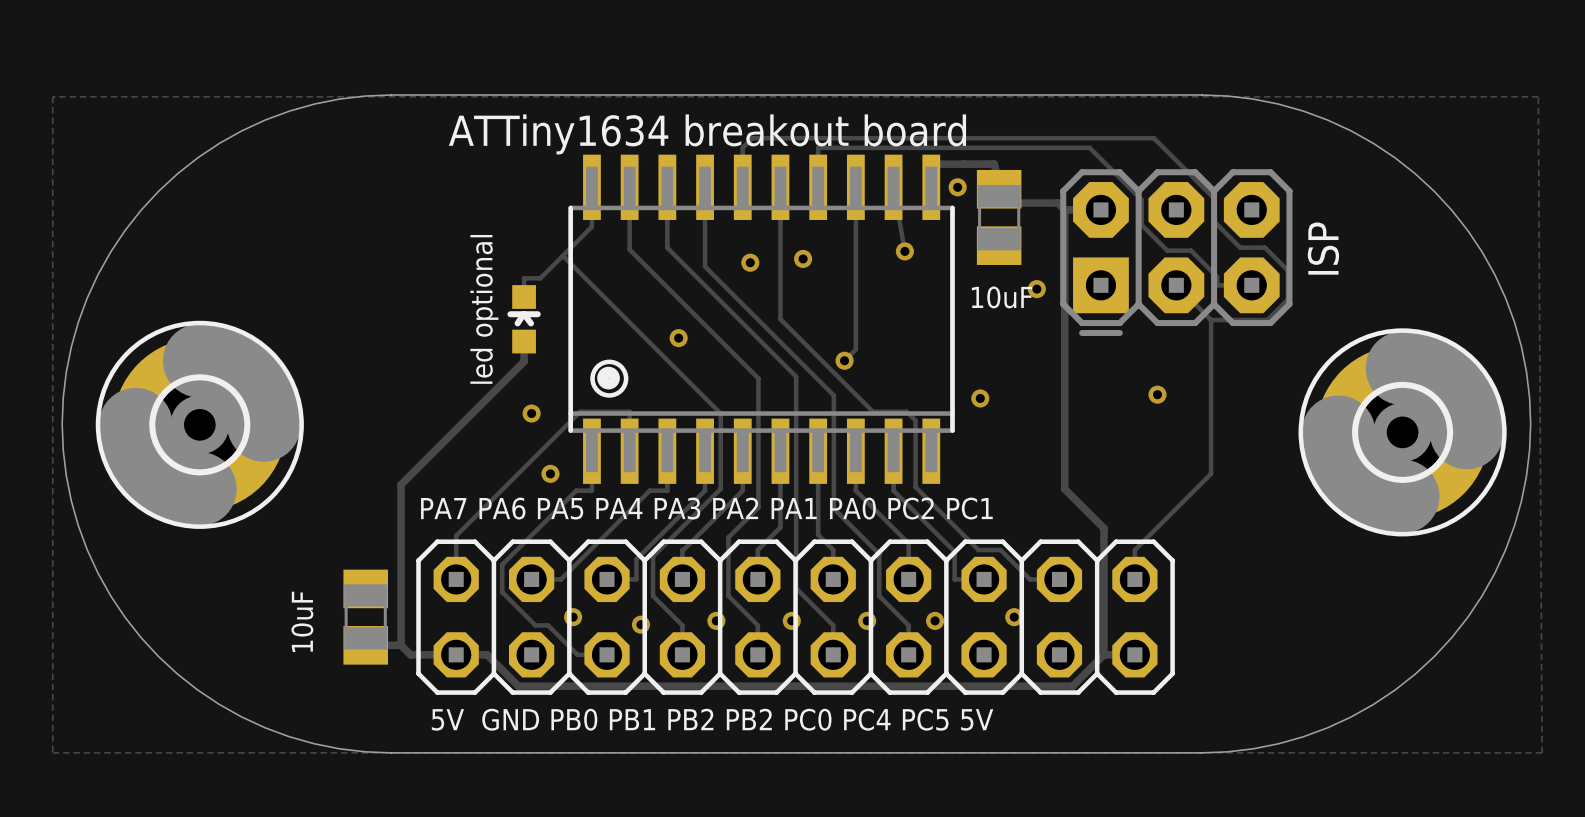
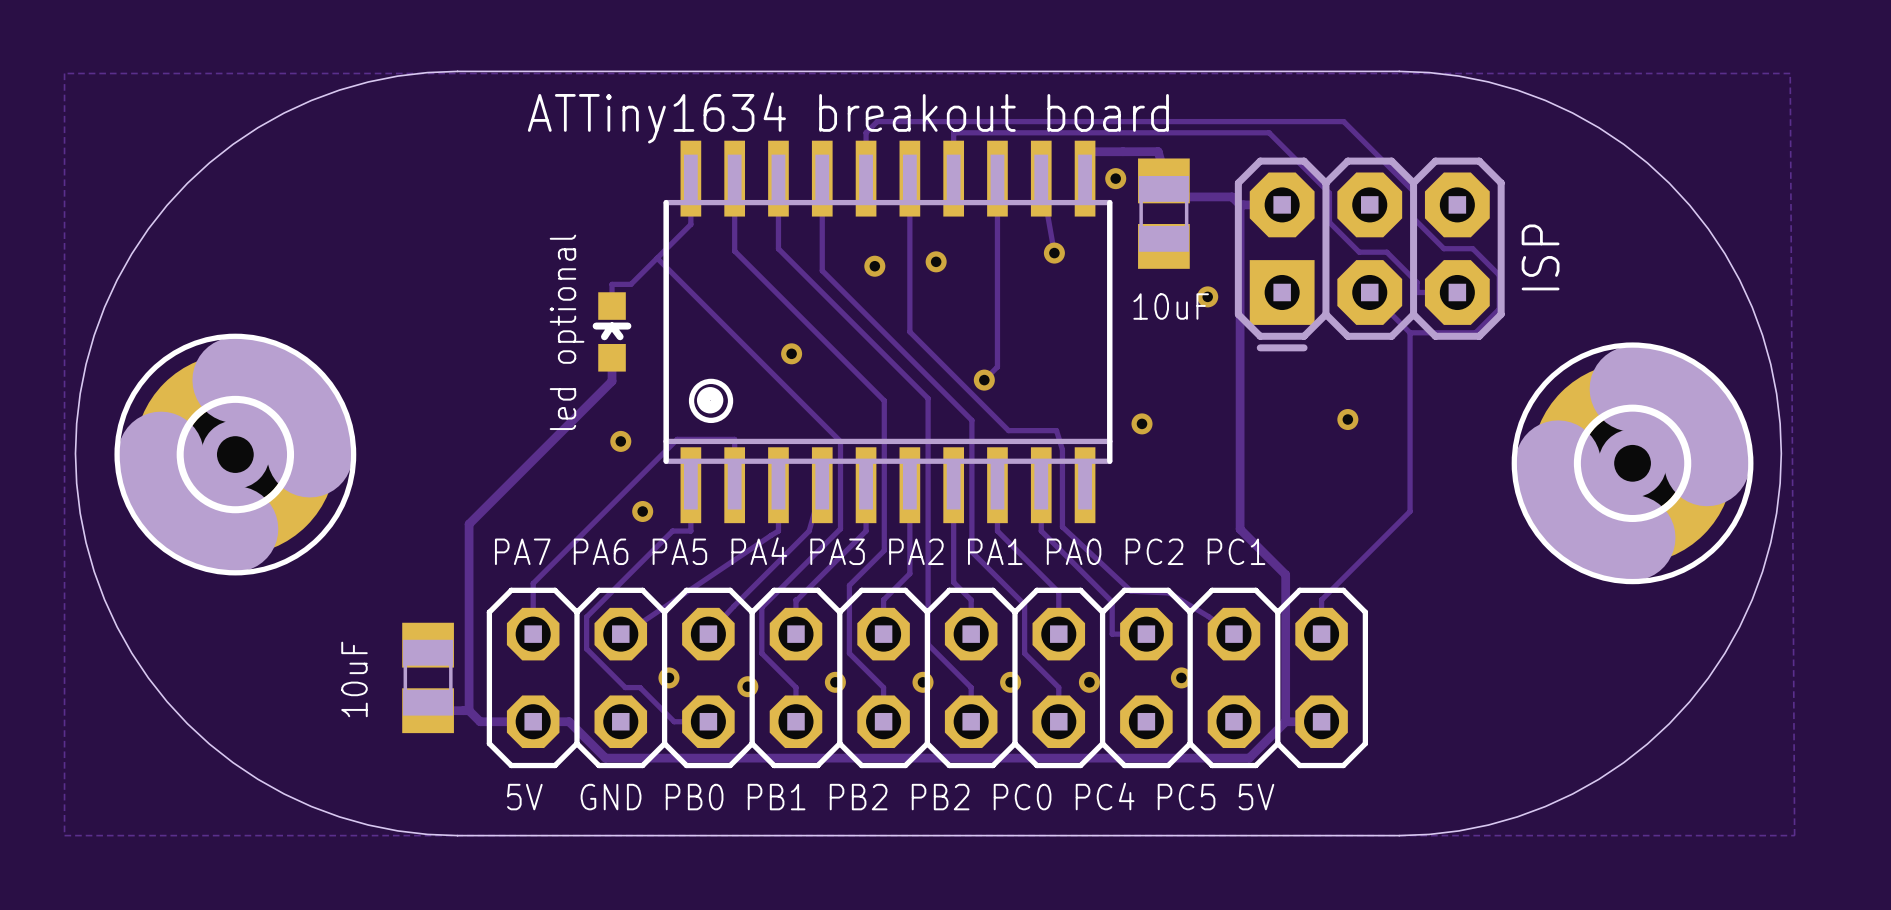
track: (865, 404) (872, 411) (906, 411) (915, 420) (915, 487) (978, 550) (1000, 550) (1030, 579) (1059, 579) -> (1008, 430) (1056, 430) (1062, 449) (1062, 526) (1131, 591) (1169, 592) (1233, 634)
track: (705, 451) (705, 490) (636, 559) (636, 579) (607, 579) -> (822, 485) (809, 531) (708, 634)
track: (667, 490) (649, 490) (561, 579) (531, 579) -> (778, 531) (637, 625) (620, 634)

